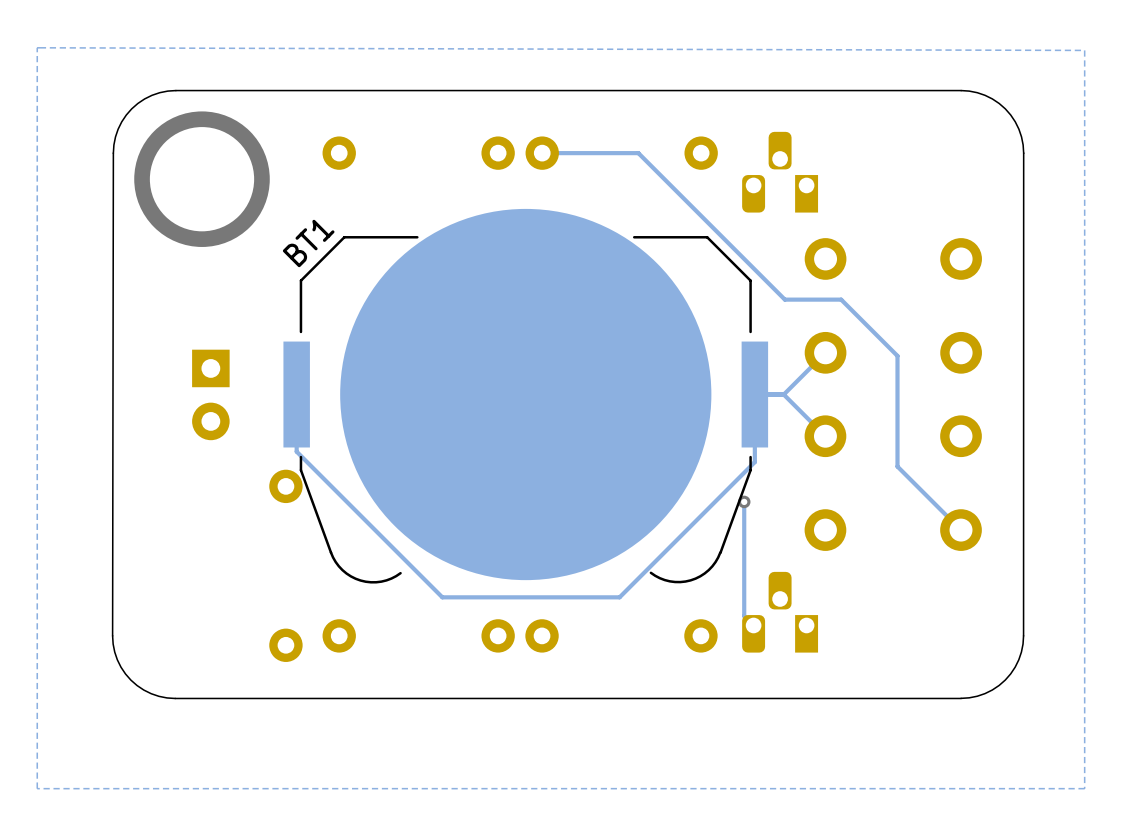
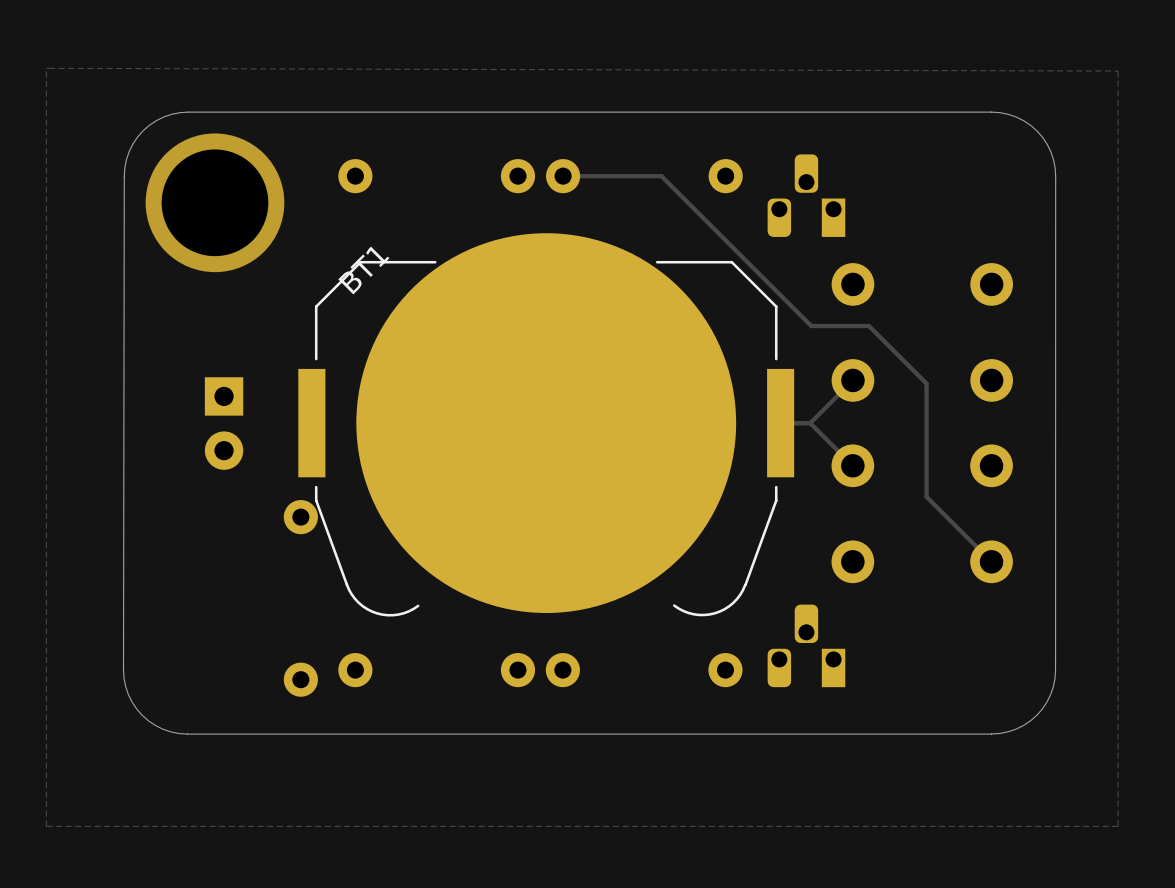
BT1 name position: BT1 (308, 243) -> BT1 (363, 270)
track: (754, 394) (754, 462) (619, 597) (442, 597) (296, 451) (296, 394) -> none
track: (744, 501) (744, 616) (753, 625) -> none
via: (744, 501) -> none

